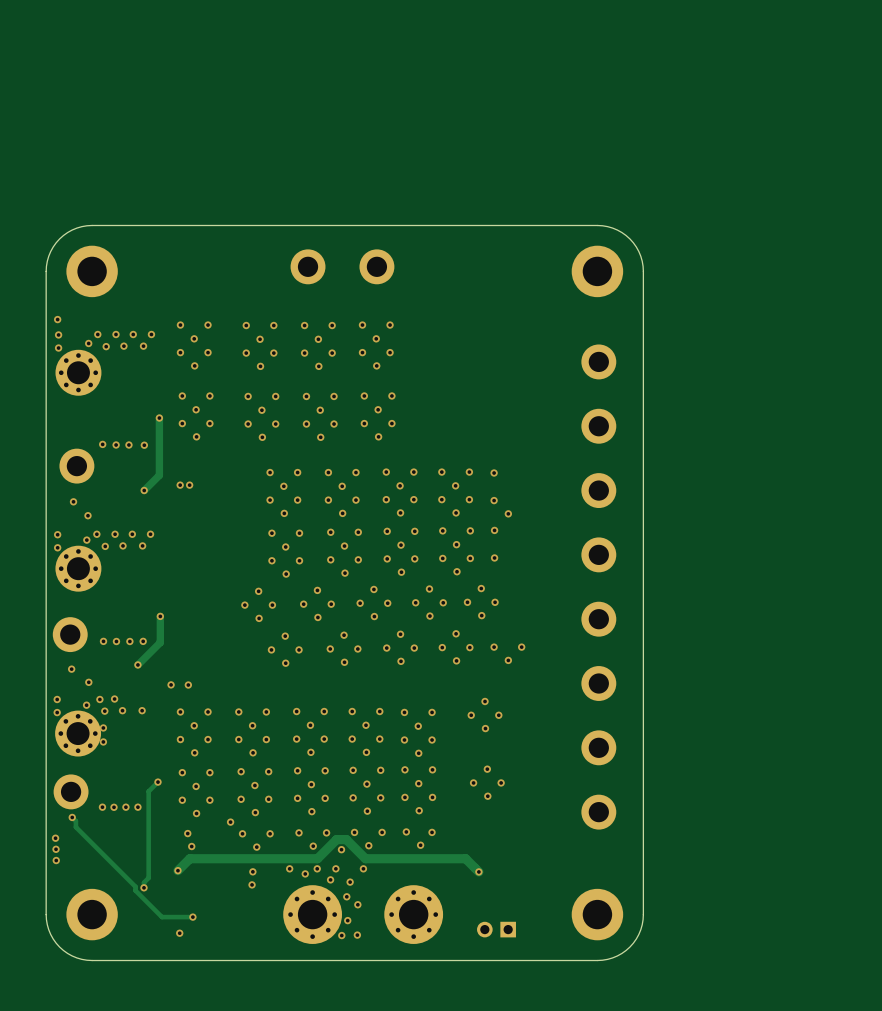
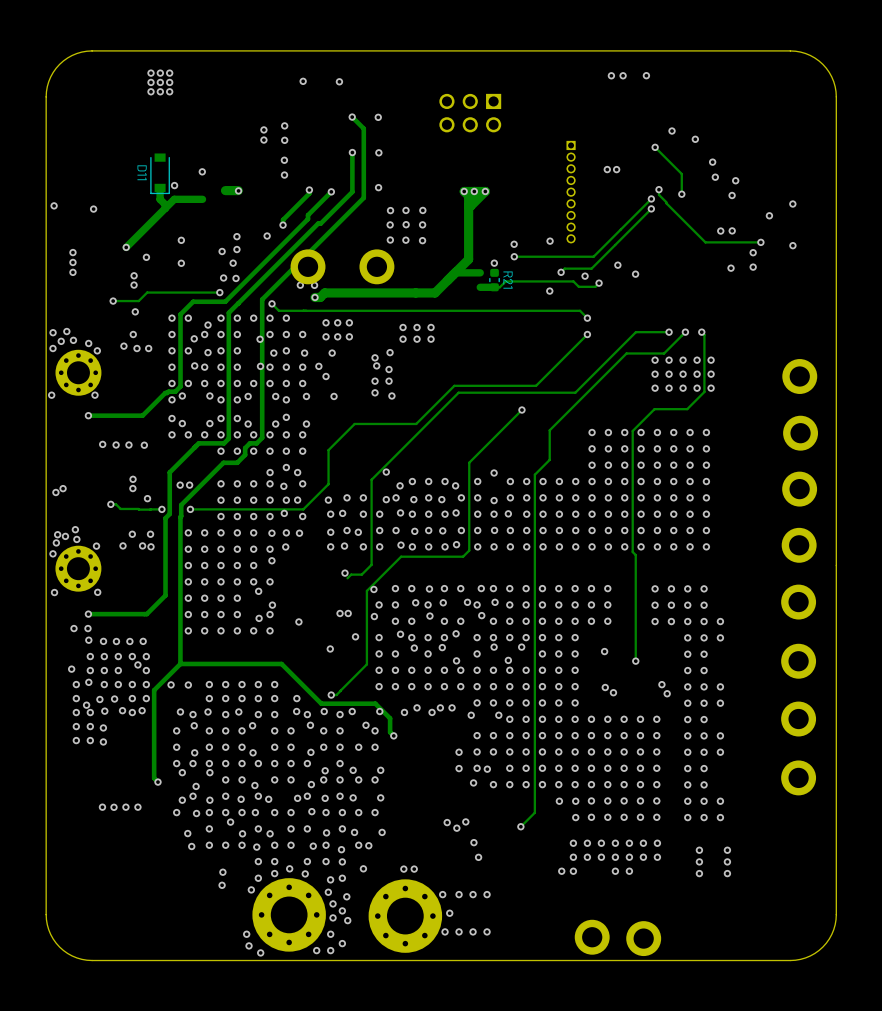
via: none -> (151, 73)
via: none -> (160, 73)
via: none -> (169, 73)
via: none -> (611, 75)
via: none -> (623, 75)
via: none -> (646, 75)
via: none -> (303, 81)
via: none -> (339, 81)
via: none -> (151, 82)
via: none -> (160, 82)
via: none -> (169, 82)
via: none -> (151, 91)
via: none -> (160, 91)
via: none -> (169, 91)
part: none -> (470, 113)
track: none -> (352, 117) (363, 128) (363, 197) (262, 299) (262, 437) (256, 443) (249, 443) (245, 448) (245, 454) (237, 462) (223, 462) (181, 505) (180, 663)
via: none -> (352, 117)
via: none -> (378, 117)
via: none -> (284, 125)
via: none -> (263, 129)
via: none -> (672, 131)
via: none -> (695, 139)
via: none -> (263, 140)
via: none -> (284, 140)
track: none -> (655, 147) (681, 174) (681, 194)
via: none -> (655, 147)
track: none -> (352, 152) (352, 191) (238, 303)
via: none -> (352, 152)
via: none -> (378, 152)
via: none -> (284, 160)
via: none -> (712, 162)
via: none -> (607, 169)
via: none -> (616, 169)
via: none -> (202, 171)
D11: none -> (160, 173)
via: none -> (284, 175)
via: none -> (715, 177)
via: none -> (735, 180)
via: none -> (174, 185)
track: none -> (160, 187) (160, 199) (165, 204) (165, 208)
via: none -> (378, 187)
track: none -> (658, 189) (658, 194) (666, 203) (705, 242) (760, 242)
via: none -> (658, 189)
track: none -> (225, 190) (238, 190)
via: none -> (238, 190)
track: none -> (309, 190) (309, 193) (283, 219) (283, 225)
via: none -> (309, 190)
track: none -> (331, 191) (308, 215) (308, 219) (225, 301) (193, 301) (180, 314) (180, 386) (175, 391) (165, 392) (142, 415) (88, 415)
via: none -> (331, 191)
via: none -> (464, 191)
via: none -> (474, 191)
via: none -> (485, 191)
part: none -> (571, 192)
via: none -> (681, 194)
track: none -> (468, 195) (464, 191) (485, 191) (468, 206)
track: none -> (468, 195) (468, 259) (435, 292) (324, 292) (320, 297) (315, 297)
via: none -> (732, 195)
track: none -> (651, 198) (593, 256) (514, 256)
via: none -> (651, 198)
track: none -> (202, 199) (174, 199) (126, 247)
via: none -> (792, 204)
via: none -> (54, 205)
track: none -> (651, 208) (591, 268) (564, 268) (561, 272)
via: none -> (651, 208)
via: none -> (93, 209)
via: none -> (390, 210)
via: none -> (405, 210)
via: none -> (422, 210)
via: none -> (769, 215)
via: none -> (390, 224)
via: none -> (406, 224)
via: none -> (422, 224)
via: none -> (283, 225)
via: none -> (732, 230)
via: none -> (720, 231)
via: none -> (236, 236)
via: none -> (267, 236)
via: none -> (181, 240)
via: none -> (390, 240)
via: none -> (405, 240)
via: none -> (422, 240)
via: none -> (550, 241)
via: none -> (760, 242)
via: none -> (514, 244)
via: none -> (792, 245)
via: none -> (126, 247)
via: none -> (236, 249)
via: none -> (222, 251)
via: none -> (72, 252)
via: none -> (753, 252)
via: none -> (514, 256)
via: none -> (146, 257)
via: none -> (72, 262)
via: none -> (181, 263)
via: none -> (233, 263)
via: none -> (494, 263)
via: none -> (617, 265)
via: none -> (753, 267)
via: none -> (731, 268)
board edge: (46, 271) (48, 256) (59, 238) (76, 228) (92, 225) (597, 225) (617, 230) (633, 242) (640, 256) (643, 271) (643, 914) (640, 929) (629, 947) (612, 957) (597, 960) -> (46, 271) (46, 91) (50, 76) (59, 64) (67, 57) (81, 52) (790, 50) (810, 55) (826, 68) (833, 81) (836, 96) (835, 924) (829, 939) (822, 947) (810, 955) (795, 960) (597, 960)
part: (92, 271) -> none
part: (597, 271) -> none
via: none -> (72, 272)
track: none -> (480, 272) (455, 272)
via: none -> (561, 272)
via: none -> (635, 274)
via: none -> (134, 275)
via: none -> (585, 276)
via: none -> (223, 277)
via: none -> (236, 278)
R21: none -> (494, 280)
track: none -> (599, 283) (595, 286) (578, 286) (573, 281) (505, 281) (499, 287) (480, 287)
via: none -> (599, 283)
via: none -> (134, 285)
via: none -> (300, 285)
via: none -> (314, 285)
via: none -> (549, 291)
track: none -> (219, 292) (147, 292) (138, 301) (113, 301)
via: none -> (219, 292)
via: none -> (315, 297)
via: none -> (113, 301)
track: none -> (238, 303) (228, 312) (228, 438) (224, 443) (198, 443) (169, 472) (169, 513) (165, 518) (165, 595) (146, 614) (88, 614)
track: none -> (272, 303) (278, 310) (580, 310) (587, 318)
via: none -> (272, 303)
via: none -> (135, 311)
via: none -> (172, 318)
via: none -> (188, 318)
via: none -> (221, 318)
via: none -> (237, 318)
via: none -> (253, 318)
via: none -> (270, 318)
via: none -> (286, 318)
via: none -> (587, 318)
via: (57, 319) -> none
via: none -> (326, 322)
via: none -> (337, 322)
via: none -> (349, 322)
via: (180, 325) -> none
via: (246, 325) -> none
via: (273, 325) -> none
via: (304, 325) -> none
via: (332, 325) -> none
via: (362, 325) -> none
via: (390, 325) -> none
via: none -> (403, 327)
via: none -> (417, 327)
via: none -> (431, 327)
via: none -> (66, 331)
via: none -> (53, 332)
track: none -> (669, 332) (635, 332) (575, 392) (458, 392) (371, 479) (371, 564) (361, 574) (351, 574) (347, 578)
via: none -> (669, 332)
track: none -> (685, 332) (664, 353) (626, 353) (549, 430) (549, 459) (534, 474) (534, 812) (520, 826)
via: none -> (685, 332)
track: none -> (701, 332) (704, 334) (704, 391) (687, 409) (654, 409) (632, 431) (632, 552) (635, 555) (635, 661)
via: none -> (701, 332)
via: (58, 334) -> none
via: (97, 334) -> none
via: (115, 334) -> none
via: (151, 334) -> none
via: none -> (172, 334)
via: none -> (204, 334)
via: none -> (221, 334)
via: none -> (237, 334)
via: none -> (270, 334)
via: none -> (286, 334)
via: none -> (302, 334)
track: none -> (587, 334) (536, 385) (454, 385) (416, 423) (354, 423) (328, 450) (328, 484) (303, 509) (190, 509)
via: none -> (587, 334)
via: none -> (326, 336)
via: none -> (337, 336)
via: none -> (349, 336)
via: (376, 338) -> none
via: (318, 339) -> none
via: none -> (403, 339)
via: none -> (417, 339)
via: none -> (431, 339)
via: none -> (73, 340)
via: none -> (61, 341)
via: (106, 346) -> none
via: (143, 346) -> none
via: none -> (52, 348)
via: (58, 348) -> none
via: none -> (136, 348)
via: none -> (148, 348)
via: none -> (97, 350)
via: none -> (172, 350)
via: none -> (188, 350)
via: none -> (221, 350)
via: none -> (237, 350)
via: none -> (286, 350)
via: (180, 352) -> none
via: (362, 352) -> none
via: (246, 353) -> none
via: none -> (375, 357)
via: none -> (655, 360)
via: none -> (669, 360)
via: none -> (683, 360)
via: none -> (697, 360)
via: none -> (711, 360)
part: (598, 361) -> none
via: none -> (172, 367)
via: none -> (204, 367)
via: none -> (221, 367)
via: none -> (237, 367)
via: none -> (270, 367)
via: none -> (286, 367)
via: none -> (302, 367)
via: none -> (389, 369)
via: none -> (655, 374)
via: none -> (669, 374)
via: none -> (683, 374)
via: none -> (697, 374)
via: none -> (711, 374)
via: none -> (326, 376)
part: none -> (799, 376)
via: none -> (375, 381)
via: none -> (389, 381)
via: none -> (172, 383)
via: none -> (188, 383)
via: none -> (204, 383)
via: none -> (221, 383)
via: none -> (237, 383)
via: none -> (253, 383)
via: none -> (270, 383)
via: none -> (286, 383)
via: none -> (302, 383)
via: none -> (655, 388)
via: none -> (669, 388)
via: none -> (683, 388)
via: none -> (697, 388)
via: none -> (711, 388)
via: none -> (375, 392)
via: none -> (51, 395)
via: none -> (94, 395)
via: (364, 395) -> none
via: none -> (172, 399)
via: none -> (221, 399)
via: none -> (237, 399)
via: none -> (286, 399)
via: (196, 409) -> none
via: (378, 409) -> none
via: (261, 410) -> none
via: (320, 410) -> none
track: none -> (521, 410) (469, 462) (469, 550) (463, 556) (401, 556) (366, 590) (366, 664) (336, 695) (331, 695)
via: none -> (521, 410)
via: none -> (88, 415)
via: none -> (286, 417)
track: (159, 418) (159, 475) (144, 490) -> none
via: (159, 418) -> none
via: none -> (172, 418)
via: none -> (221, 418)
via: none -> (237, 418)
via: (364, 423) -> none
via: (391, 423) -> none
via: (334, 424) -> none
part: (598, 426) -> none
via: none -> (592, 432)
via: none -> (608, 432)
via: none -> (624, 432)
via: none -> (641, 432)
via: none -> (657, 432)
via: none -> (673, 432)
via: none -> (690, 432)
via: none -> (706, 432)
part: none -> (800, 433)
via: none -> (172, 434)
via: none -> (188, 434)
via: none -> (204, 434)
via: none -> (221, 434)
via: none -> (237, 434)
via: none -> (253, 434)
via: none -> (270, 434)
via: none -> (286, 434)
via: none -> (302, 434)
via: (196, 436) -> none
via: (378, 436) -> none
via: (262, 437) -> none
via: (320, 437) -> none
via: none -> (592, 448)
via: none -> (608, 448)
via: none -> (624, 448)
via: none -> (641, 448)
via: none -> (657, 448)
via: none -> (673, 448)
via: none -> (690, 448)
via: none -> (706, 448)
via: none -> (221, 451)
via: none -> (237, 451)
via: none -> (253, 451)
via: none -> (270, 451)
via: none -> (286, 451)
via: none -> (302, 451)
via: none -> (592, 465)
via: none -> (608, 465)
via: none -> (624, 465)
via: none -> (641, 465)
via: none -> (657, 465)
via: none -> (673, 465)
via: none -> (690, 465)
via: none -> (706, 465)
part: (76, 466) -> none
via: none -> (286, 467)
via: (328, 472) -> none
via: (355, 472) -> none
via: (413, 472) -> none
via: (441, 472) -> none
via: (469, 472) -> none
via: none -> (133, 479)
via: none -> (412, 481)
via: none -> (428, 481)
via: none -> (445, 481)
via: none -> (477, 481)
via: none -> (510, 481)
via: none -> (526, 481)
via: none -> (543, 481)
via: none -> (559, 481)
via: none -> (575, 481)
via: none -> (592, 481)
via: none -> (608, 481)
via: none -> (624, 481)
via: none -> (641, 481)
via: none -> (657, 481)
via: none -> (673, 481)
via: none -> (690, 481)
via: none -> (706, 481)
via: none -> (221, 483)
via: none -> (237, 483)
via: none -> (253, 483)
via: none -> (270, 483)
via: none -> (302, 483)
via: (342, 486) -> none
via: none -> (63, 488)
via: none -> (132, 488)
part: none -> (799, 489)
via: (144, 490) -> none
part: (598, 490) -> none
via: none -> (55, 492)
via: none -> (347, 497)
via: none -> (363, 497)
via: none -> (396, 497)
via: none -> (428, 497)
via: none -> (461, 497)
via: none -> (477, 497)
via: none -> (510, 497)
via: none -> (526, 497)
via: none -> (543, 497)
via: none -> (559, 497)
via: none -> (575, 497)
via: none -> (592, 497)
via: none -> (608, 497)
via: none -> (624, 497)
via: none -> (641, 497)
via: none -> (657, 497)
via: none -> (673, 497)
via: none -> (690, 497)
via: none -> (706, 497)
via: none -> (147, 498)
via: (469, 499) -> none
via: none -> (221, 500)
via: none -> (237, 500)
via: none -> (253, 500)
via: none -> (286, 500)
via: (355, 500) -> none
via: (73, 501) -> none
track: none -> (110, 504) (116, 504) (120, 508) (161, 509)
via: none -> (110, 504)
via: none -> (161, 509)
via: none -> (190, 509)
via: none -> (330, 514)
via: none -> (363, 514)
via: none -> (379, 514)
via: none -> (412, 514)
via: none -> (428, 514)
via: none -> (445, 514)
via: none -> (477, 514)
via: none -> (494, 514)
via: none -> (526, 514)
via: none -> (543, 514)
via: none -> (559, 514)
via: none -> (575, 514)
via: none -> (592, 514)
via: none -> (608, 514)
via: none -> (624, 514)
via: none -> (641, 514)
via: none -> (657, 514)
via: none -> (673, 514)
via: none -> (690, 514)
via: none -> (706, 514)
via: (87, 515) -> none
via: none -> (221, 516)
via: none -> (237, 516)
via: none -> (253, 516)
via: none -> (270, 516)
via: none -> (302, 516)
via: none -> (75, 529)
via: none -> (347, 530)
via: none -> (379, 530)
via: none -> (396, 530)
via: none -> (428, 530)
via: none -> (461, 530)
via: (470, 530) -> none
via: none -> (477, 530)
via: none -> (510, 530)
via: none -> (526, 530)
via: none -> (543, 530)
via: none -> (559, 530)
via: none -> (575, 530)
via: none -> (592, 530)
via: none -> (608, 530)
via: none -> (624, 530)
via: none -> (641, 530)
via: none -> (657, 530)
via: none -> (673, 530)
via: none -> (690, 530)
via: none -> (706, 530)
via: (387, 531) -> none
via: none -> (188, 532)
via: none -> (204, 532)
via: none -> (221, 532)
via: none -> (237, 532)
via: none -> (253, 532)
via: none -> (286, 532)
via: (96, 534) -> none
via: (115, 534) -> none
via: none -> (65, 536)
via: none -> (76, 539)
via: (86, 540) -> none
via: none -> (56, 542)
part: none -> (799, 545)
via: none -> (96, 546)
via: (105, 546) -> none
via: none -> (151, 546)
via: none -> (363, 546)
via: none -> (379, 546)
via: none -> (412, 546)
via: none -> (428, 546)
via: none -> (445, 546)
via: none -> (477, 546)
via: none -> (494, 546)
via: none -> (510, 546)
via: none -> (526, 546)
via: none -> (543, 546)
via: none -> (559, 546)
via: none -> (575, 546)
via: none -> (592, 546)
via: none -> (608, 546)
via: none -> (624, 546)
via: none -> (641, 546)
via: none -> (657, 546)
via: none -> (673, 546)
via: none -> (690, 546)
via: none -> (706, 546)
via: (57, 547) -> none
via: none -> (188, 549)
via: none -> (204, 549)
via: none -> (221, 549)
via: none -> (237, 549)
via: none -> (253, 549)
via: none -> (270, 549)
via: none -> (52, 553)
part: (598, 554) -> none
via: (494, 557) -> none
via: (387, 558) -> none
via: (414, 558) -> none
via: (442, 558) -> none
via: (470, 558) -> none
via position: (330, 559) -> (330, 546)
via: (358, 559) -> none
via: (299, 560) -> none
via: none -> (188, 565)
via: none -> (204, 565)
via: none -> (221, 565)
via: none -> (237, 565)
via: none -> (253, 565)
via: (457, 571) -> none
via: (401, 572) -> none
via: (286, 574) -> none
via: none -> (188, 581)
via: none -> (204, 581)
via: none -> (221, 581)
via: none -> (237, 581)
via: none -> (253, 581)
via: none -> (270, 581)
via: none -> (395, 588)
via: none -> (411, 588)
via: none -> (444, 588)
via: none -> (460, 588)
via: none -> (493, 588)
via: none -> (509, 588)
via: none -> (526, 588)
via: none -> (542, 588)
via: none -> (558, 588)
via: none -> (575, 588)
via: none -> (591, 588)
via: none -> (607, 588)
via: none -> (655, 588)
via: none -> (671, 588)
via: none -> (687, 588)
via: none -> (704, 588)
via: (317, 590) -> none
via: none -> (54, 592)
via: none -> (97, 592)
via: none -> (188, 598)
via: none -> (204, 598)
via: none -> (221, 598)
via: none -> (237, 598)
part: none -> (798, 602)
via: (360, 603) -> none
via: (387, 603) -> none
via: (303, 604) -> none
via: (331, 604) -> none
via: none -> (379, 604)
via: none -> (395, 604)
via: none -> (428, 604)
via: none -> (477, 604)
via: none -> (509, 604)
via: none -> (526, 604)
via: none -> (542, 604)
via: none -> (558, 604)
via: none -> (575, 604)
via: none -> (591, 604)
via: none -> (607, 604)
via: (244, 605) -> none
via: none -> (655, 605)
via: none -> (671, 605)
via: none -> (687, 605)
via: none -> (704, 605)
via: none -> (340, 613)
via: none -> (348, 613)
via: none -> (88, 614)
via: none -> (188, 614)
via: none -> (204, 614)
via: none -> (221, 614)
via: none -> (237, 614)
via: none -> (270, 614)
track: (160, 616) (160, 642) (137, 664) -> none
via: (160, 616) -> none
via: (317, 617) -> none
part: (598, 619) -> none
via: none -> (298, 621)
via: none -> (395, 621)
via: none -> (411, 621)
via: none -> (444, 621)
via: none -> (460, 621)
via: none -> (493, 621)
via: none -> (509, 621)
via: none -> (526, 621)
via: none -> (542, 621)
via: none -> (558, 621)
via: none -> (575, 621)
via: none -> (591, 621)
via: none -> (607, 621)
via: none -> (655, 621)
via: none -> (671, 621)
via: none -> (687, 621)
via: none -> (704, 621)
via: none -> (720, 621)
via: none -> (73, 628)
via: none -> (87, 628)
via: none -> (188, 630)
via: none -> (204, 630)
via: none -> (221, 630)
via: none -> (237, 630)
via: none -> (253, 630)
via: none -> (270, 630)
part: (70, 634) -> none
via: (344, 635) -> none
via: (285, 636) -> none
via: none -> (355, 636)
via: none -> (379, 637)
via: none -> (411, 637)
via: none -> (428, 637)
via: none -> (444, 637)
via: none -> (477, 637)
via: none -> (493, 637)
via: none -> (509, 637)
via: none -> (526, 637)
via: none -> (542, 637)
via: none -> (558, 637)
via: none -> (575, 637)
via: none -> (687, 637)
via: none -> (704, 637)
via: none -> (720, 637)
via: none -> (88, 640)
via: (469, 647) -> none
via: (357, 648) -> none
via: (386, 648) -> none
via: (271, 649) -> none
via: (299, 649) -> none
via: none -> (604, 651)
via: none -> (379, 653)
via: none -> (395, 653)
via: none -> (428, 653)
via: none -> (477, 653)
via: none -> (542, 653)
via: none -> (558, 653)
via: none -> (575, 653)
via: none -> (687, 654)
via: none -> (704, 654)
via: none -> (90, 656)
via: none -> (104, 656)
via: none -> (118, 656)
via: none -> (132, 656)
via: none -> (146, 656)
via: (401, 661) -> none
via: none -> (635, 661)
part: none -> (798, 661)
via: (344, 662) -> none
track: none -> (180, 663) (281, 663) (321, 703) (375, 703) (390, 718) (390, 732) (393, 735)
via: (285, 663) -> none
via: none -> (90, 670)
via: none -> (104, 670)
via: none -> (118, 670)
via: none -> (146, 670)
via: none -> (379, 670)
via: none -> (395, 670)
via: none -> (411, 670)
via: none -> (428, 670)
via: none -> (444, 670)
via: none -> (460, 670)
via: none -> (477, 670)
via: none -> (493, 670)
via: none -> (509, 670)
via: none -> (526, 670)
via: none -> (542, 670)
via: none -> (558, 670)
via: none -> (575, 670)
via: none -> (687, 670)
via: none -> (704, 670)
part: (598, 683) -> none
via: none -> (76, 684)
via: none -> (104, 684)
via: none -> (118, 684)
via: none -> (132, 684)
via: none -> (146, 684)
via: none -> (209, 684)
via: none -> (225, 684)
via: none -> (242, 684)
via: none -> (258, 684)
via: none -> (274, 684)
via: none -> (661, 684)
via: none -> (379, 686)
via: none -> (395, 686)
via: none -> (411, 686)
via: none -> (428, 686)
via: none -> (444, 686)
via: none -> (460, 686)
via: none -> (477, 686)
via: none -> (493, 686)
via: none -> (509, 686)
via: none -> (526, 686)
via: none -> (542, 686)
via: none -> (558, 686)
via: none -> (575, 686)
via: none -> (687, 686)
via: none -> (704, 686)
via: none -> (720, 686)
via: none -> (605, 687)
via: none -> (613, 692)
via: none -> (667, 693)
via: none -> (331, 695)
via: none -> (76, 698)
via: none -> (132, 698)
via: none -> (146, 698)
via: none -> (209, 698)
via: none -> (225, 698)
via: none -> (242, 698)
via: none -> (258, 698)
via: none -> (274, 698)
via: none -> (296, 698)
via: (57, 699) -> none
via: (485, 701) -> none
via: none -> (477, 702)
via: none -> (493, 702)
via: none -> (509, 702)
via: none -> (526, 702)
via: none -> (542, 702)
via: none -> (558, 702)
via: none -> (575, 702)
via: none -> (687, 703)
via: none -> (704, 703)
via: none -> (720, 703)
via: none -> (417, 707)
via: none -> (440, 707)
via: none -> (452, 707)
via: (266, 711) -> none
via: (57, 712) -> none
via: none -> (76, 712)
via: none -> (90, 712)
via: none -> (132, 712)
via: none -> (193, 714)
via: none -> (225, 714)
via: none -> (258, 714)
via: none -> (274, 714)
via: none -> (307, 714)
via: none -> (340, 714)
via: none -> (509, 719)
via: none -> (526, 719)
via: none -> (542, 719)
via: none -> (558, 719)
via: none -> (575, 719)
via: none -> (591, 719)
via: none -> (607, 719)
via: none -> (624, 719)
via: none -> (640, 719)
via: none -> (656, 719)
via: none -> (687, 719)
via: none -> (704, 719)
part: none -> (798, 719)
via: none -> (76, 726)
via: none -> (90, 726)
via: (418, 726) -> none
via: (485, 728) -> none
via: none -> (176, 730)
via: none -> (209, 730)
via: none -> (225, 730)
via: none -> (242, 730)
via: none -> (274, 730)
via: none -> (291, 730)
via: none -> (323, 730)
via: none -> (340, 730)
via: none -> (375, 730)
part: (78, 733) -> none
via: none -> (393, 735)
via: none -> (477, 735)
via: none -> (493, 735)
via: none -> (509, 735)
via: none -> (526, 735)
via: none -> (542, 735)
via: none -> (558, 735)
via: none -> (575, 735)
via: none -> (591, 735)
via: none -> (607, 735)
via: none -> (624, 735)
via: none -> (640, 735)
via: none -> (656, 735)
via: none -> (687, 735)
via: none -> (704, 735)
via: none -> (720, 735)
via: (180, 739) -> none
via: (208, 739) -> none
via: (238, 739) -> none
via: (266, 739) -> none
via: (296, 739) -> none
via: (324, 739) -> none
via: (352, 739) -> none
via: (379, 739) -> none
via: none -> (76, 740)
via: none -> (90, 740)
via: (404, 740) -> none
via: (432, 740) -> none
via: none -> (176, 747)
via: none -> (209, 747)
via: none -> (225, 747)
via: none -> (242, 747)
via: none -> (274, 747)
via: none -> (291, 747)
via: none -> (323, 747)
via: none -> (340, 747)
via: none -> (358, 747)
via: none -> (375, 747)
part: (598, 747) -> none
via: none -> (477, 751)
via: none -> (493, 751)
via: none -> (509, 751)
via: none -> (526, 751)
via: none -> (542, 751)
via: none -> (558, 751)
via: none -> (575, 751)
via: none -> (591, 751)
via: none -> (607, 751)
via: none -> (624, 751)
via: none -> (640, 751)
via: none -> (656, 751)
via: (366, 752) -> none
via: none -> (459, 752)
via: none -> (687, 752)
via: none -> (704, 752)
via: none -> (720, 752)
via: (418, 753) -> none
via: none -> (176, 763)
via: none -> (193, 763)
via: none -> (209, 763)
via: none -> (225, 763)
via: none -> (242, 763)
via: none -> (258, 763)
via: none -> (274, 763)
via: none -> (291, 763)
via: none -> (307, 763)
via: none -> (340, 763)
via: none -> (459, 768)
via: none -> (477, 768)
via: none -> (509, 768)
via: none -> (526, 768)
via: none -> (542, 768)
via: none -> (558, 768)
via: none -> (575, 768)
via: none -> (591, 768)
via: none -> (607, 768)
via: none -> (624, 768)
via: none -> (640, 768)
via: none -> (656, 768)
via: none -> (687, 768)
via: none -> (704, 768)
via: (404, 769) -> none
via: (432, 769) -> none
via: (297, 770) -> none
via: (241, 771) -> none
via: (268, 771) -> none
part: none -> (798, 777)
via: none -> (225, 779)
via: none -> (242, 779)
via: none -> (274, 779)
via: none -> (291, 779)
via: none -> (323, 779)
via: none -> (340, 779)
via: none -> (358, 779)
via: none -> (375, 779)
track: (158, 782) (148, 791) (148, 877) (144, 882) (144, 887) -> (157, 781) (154, 778) (154, 690) (180, 663)
via: (501, 782) -> none
via: (418, 783) -> none
via: (366, 784) -> none
via: none -> (493, 784)
via: none -> (509, 784)
via: none -> (526, 784)
via: none -> (542, 784)
via: none -> (558, 784)
via: none -> (575, 784)
via: none -> (591, 784)
via: none -> (607, 784)
via: none -> (624, 784)
via: none -> (640, 784)
via: none -> (656, 784)
via: none -> (687, 784)
via: none -> (704, 784)
part: (71, 791) -> none
via: none -> (193, 796)
via: none -> (225, 796)
via: none -> (258, 796)
via: none -> (307, 796)
via: none -> (340, 796)
via: (487, 796) -> none
via: (404, 797) -> none
via: (432, 797) -> none
via: none -> (591, 800)
via: none -> (607, 800)
via: none -> (624, 800)
via: none -> (640, 800)
via: none -> (656, 800)
via: none -> (559, 801)
via: none -> (575, 801)
via: none -> (687, 801)
via: none -> (704, 801)
via: none -> (720, 801)
via: (419, 810) -> none
via: (367, 811) -> none
via: none -> (176, 812)
via: none -> (209, 812)
via: none -> (225, 812)
via: none -> (242, 812)
via: none -> (274, 812)
via: none -> (291, 812)
via: none -> (326, 812)
via: none -> (342, 812)
via: none -> (358, 812)
via: none -> (375, 812)
part: (598, 812) -> none
track: (72, 817) (75, 821) (75, 827) (135, 886) (135, 890) (162, 917) (192, 917) -> none
via: (72, 817) -> none
via: none -> (575, 817)
via: none -> (591, 817)
via: none -> (607, 817)
via: none -> (624, 817)
via: none -> (640, 817)
via: none -> (656, 817)
via: none -> (687, 817)
via: none -> (704, 817)
via: none -> (720, 817)
via: none -> (465, 821)
via: none -> (447, 822)
via: none -> (520, 826)
via: none -> (209, 828)
via: none -> (258, 828)
via: none -> (291, 828)
via: none -> (307, 828)
via: none -> (342, 828)
via: none -> (456, 828)
via: (406, 831) -> none
via: (299, 832) -> none
via: (432, 832) -> none
via: (55, 838) -> none
via: none -> (473, 842)
via: none -> (573, 843)
via: none -> (587, 843)
via: none -> (601, 843)
via: none -> (615, 843)
via: none -> (629, 843)
via: none -> (643, 843)
via: none -> (657, 843)
via: none -> (209, 845)
via: none -> (225, 845)
via: none -> (242, 845)
via: none -> (274, 845)
via: none -> (291, 845)
via: none -> (326, 845)
via: none -> (358, 845)
via: (420, 845) -> none
via: (56, 849) -> none
via: none -> (699, 850)
via: none -> (727, 850)
via: none -> (478, 857)
via: none -> (573, 857)
via: none -> (587, 857)
via: none -> (601, 857)
via: none -> (615, 857)
via: none -> (629, 857)
via: none -> (643, 857)
via: none -> (657, 857)
via: (56, 860) -> none
via: none -> (258, 861)
via: none -> (274, 861)
via: none -> (307, 861)
via: none -> (326, 861)
via: none -> (342, 861)
via: none -> (699, 861)
via: none -> (727, 861)
via: (317, 868) -> none
via: (335, 868) -> none
via: none -> (403, 869)
via: none -> (414, 869)
track: (177, 870) (189, 858) (317, 858) (336, 839) (346, 839) (365, 858) (465, 858) (478, 871) -> none
via: (177, 870) -> none
via: (252, 871) -> none
via: (478, 871) -> none
via: none -> (561, 871)
via: none -> (573, 871)
via: none -> (615, 871)
via: none -> (629, 871)
via: none -> (222, 872)
via: none -> (274, 873)
via: none -> (699, 873)
via: none -> (727, 873)
via: none -> (258, 878)
via: none -> (342, 878)
via: (350, 882) -> none
via: (252, 884) -> none
via: none -> (222, 885)
part footprint: [384, 885, 444, 944] -> [368, 879, 443, 953]
via: (144, 887) -> none
via: none -> (251, 889)
via: none -> (328, 892)
via: none -> (442, 894)
via: none -> (459, 894)
via: none -> (473, 894)
via: none -> (487, 894)
via: none -> (333, 903)
via: (357, 904) -> none
via: none -> (342, 910)
via: none -> (449, 913)
part: (92, 914) -> none
part: none -> (289, 914)
part: (312, 914) -> none
part: (597, 914) -> none
via: (192, 917) -> none
via: none -> (333, 917)
part: (496, 929) -> none
via: none -> (445, 931)
via: none -> (459, 931)
via: none -> (473, 931)
via: none -> (487, 931)
via: (179, 933) -> none
via: none -> (246, 934)
via: none -> (330, 934)
via: (341, 935) -> none
via: (357, 935) -> none
part: none -> (592, 937)
part: none -> (643, 938)
via: none -> (342, 943)
via: none -> (249, 945)
via: none -> (316, 950)
via: none -> (330, 950)
via: none -> (260, 952)

